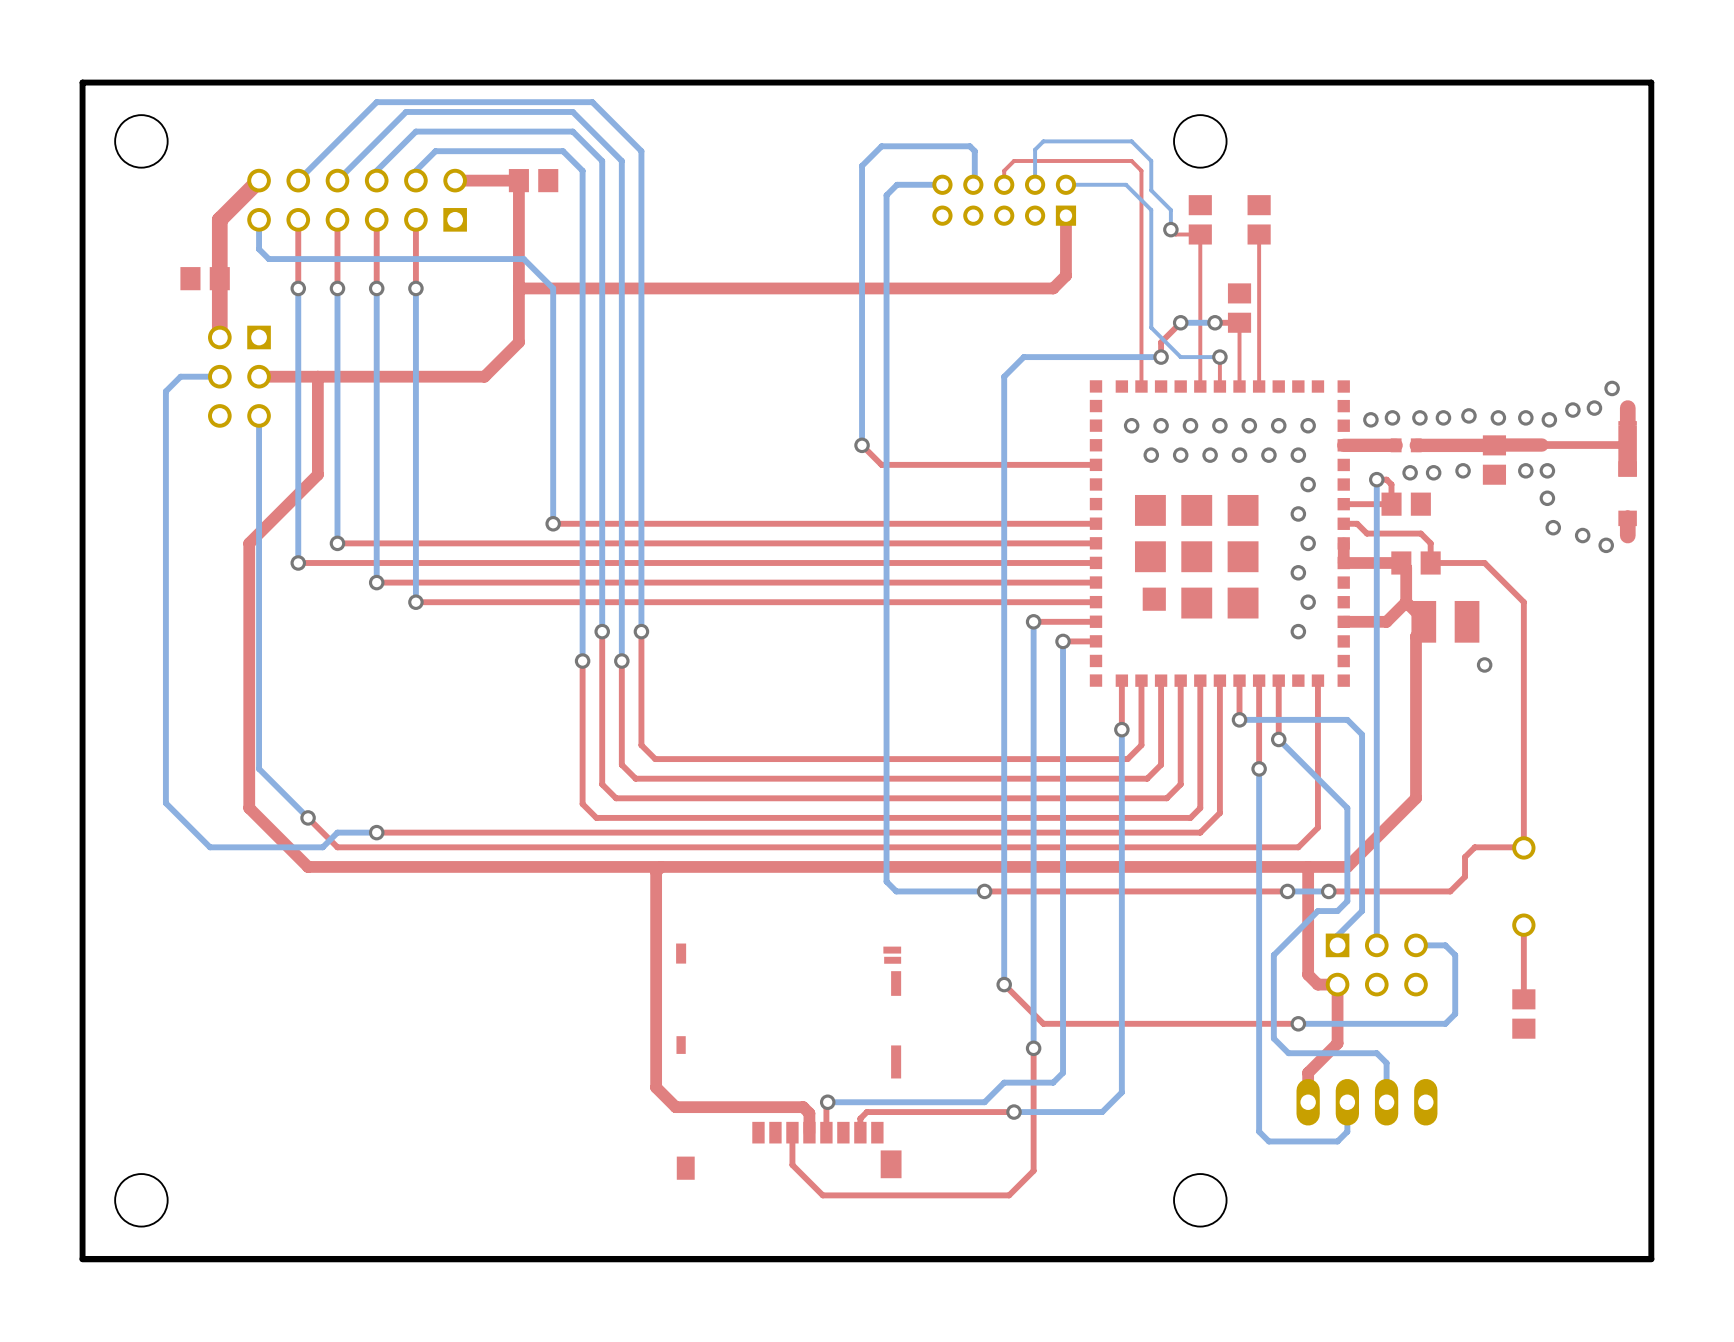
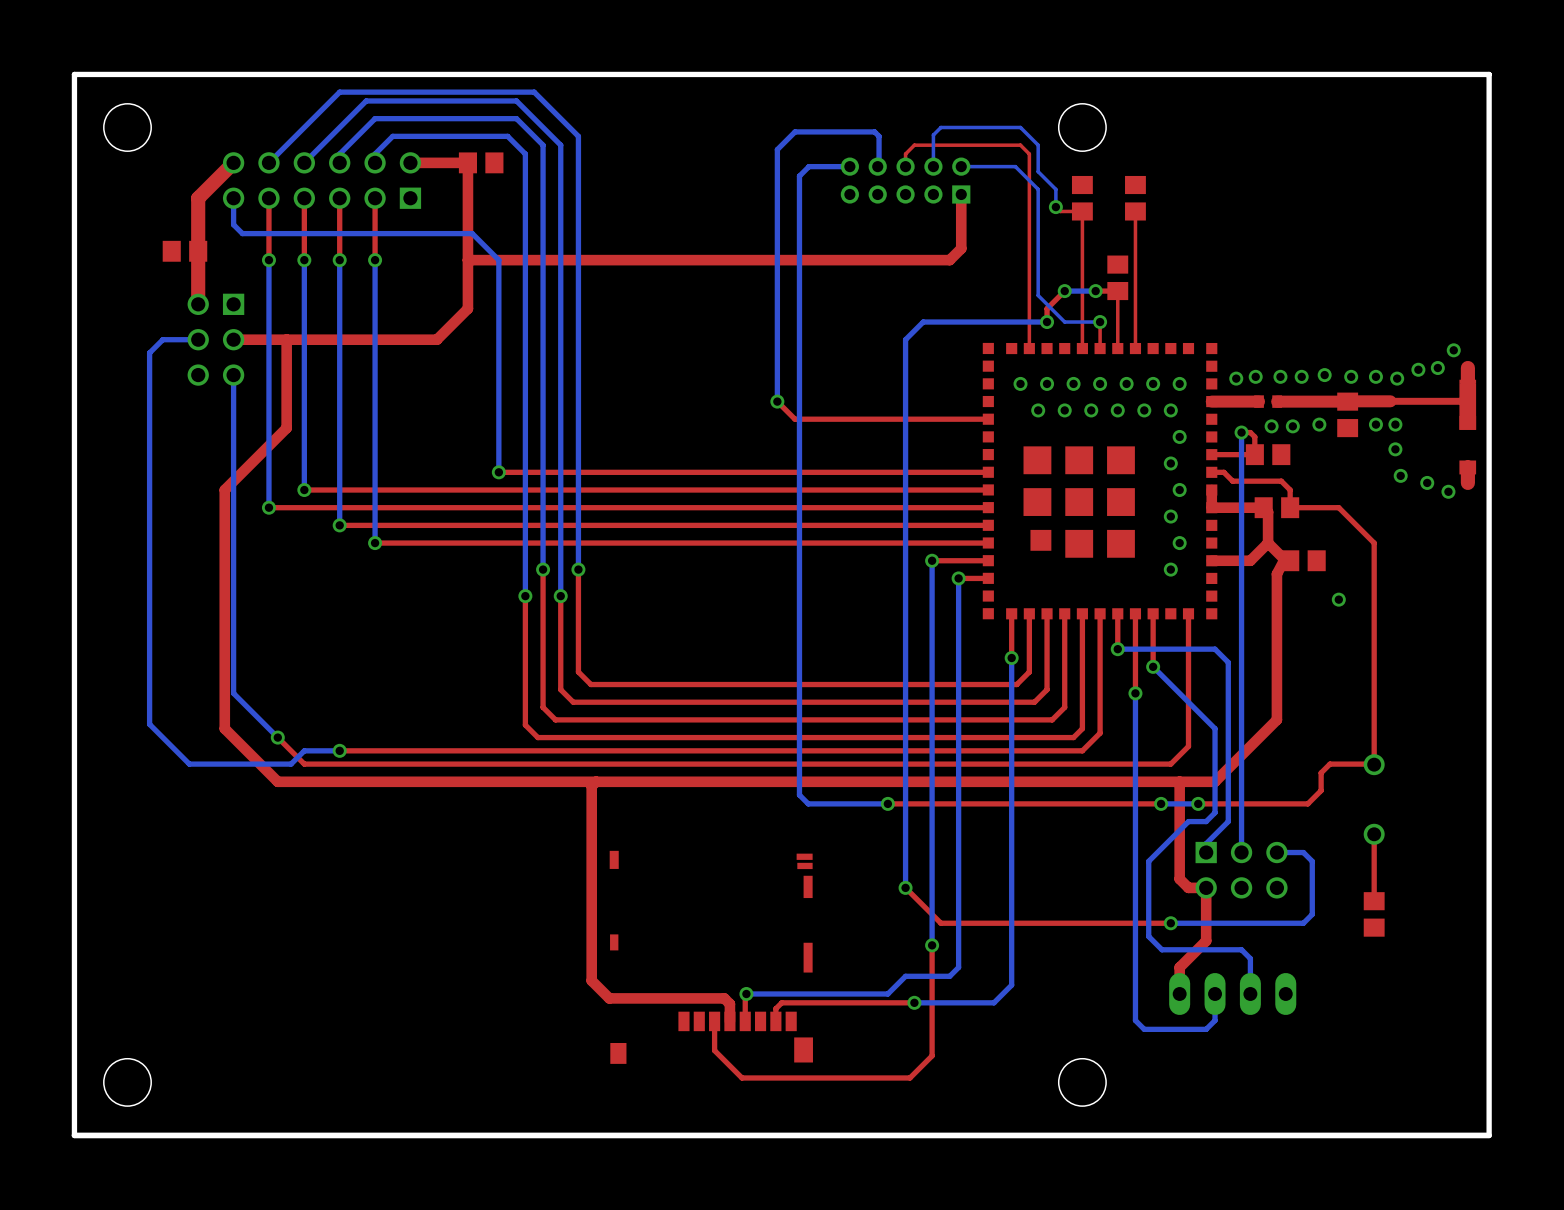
part footprint: [1411, 600, 1480, 643] -> [1281, 550, 1326, 572]

